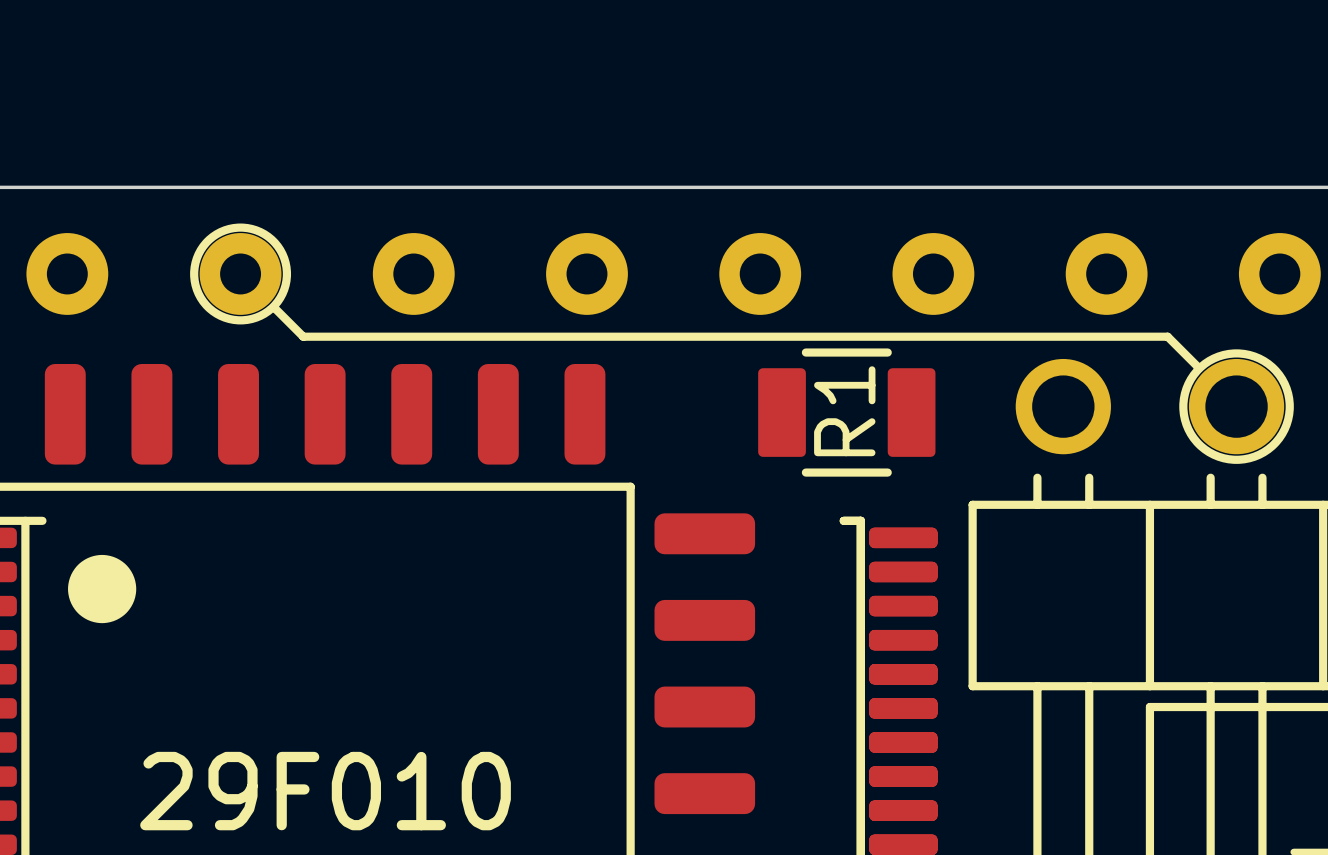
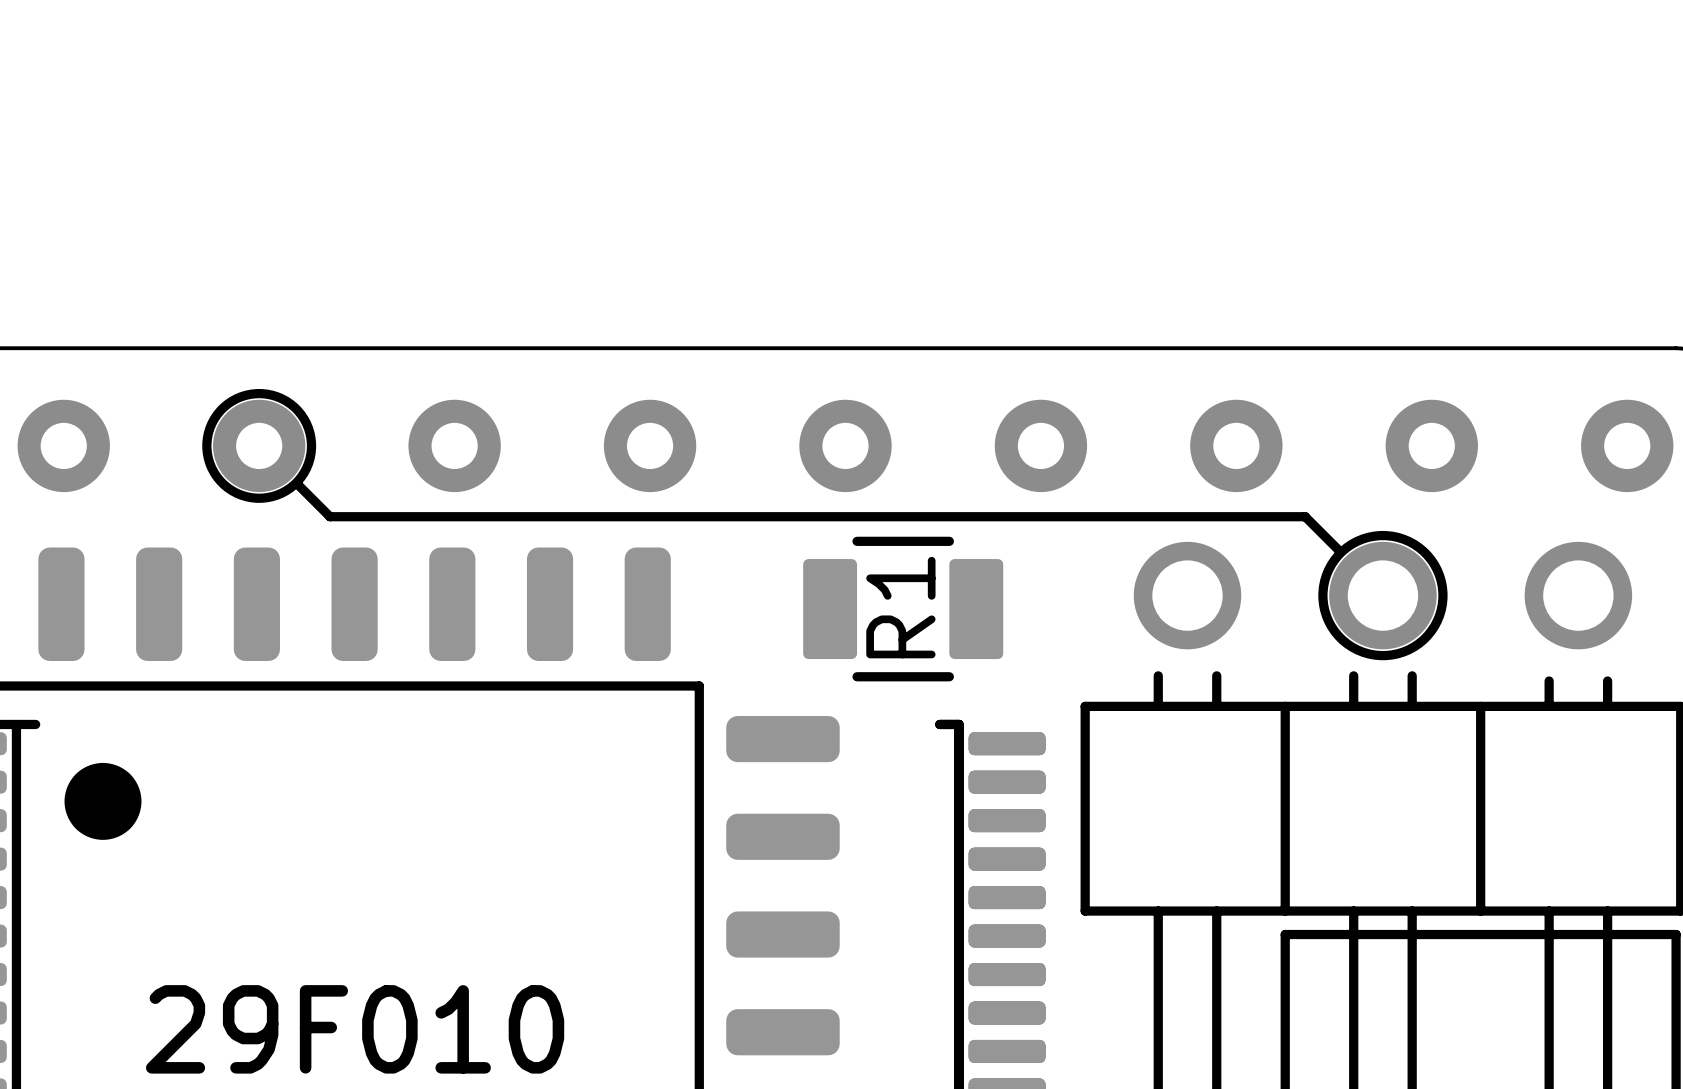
R1 position: (846, 412) -> (903, 609)

